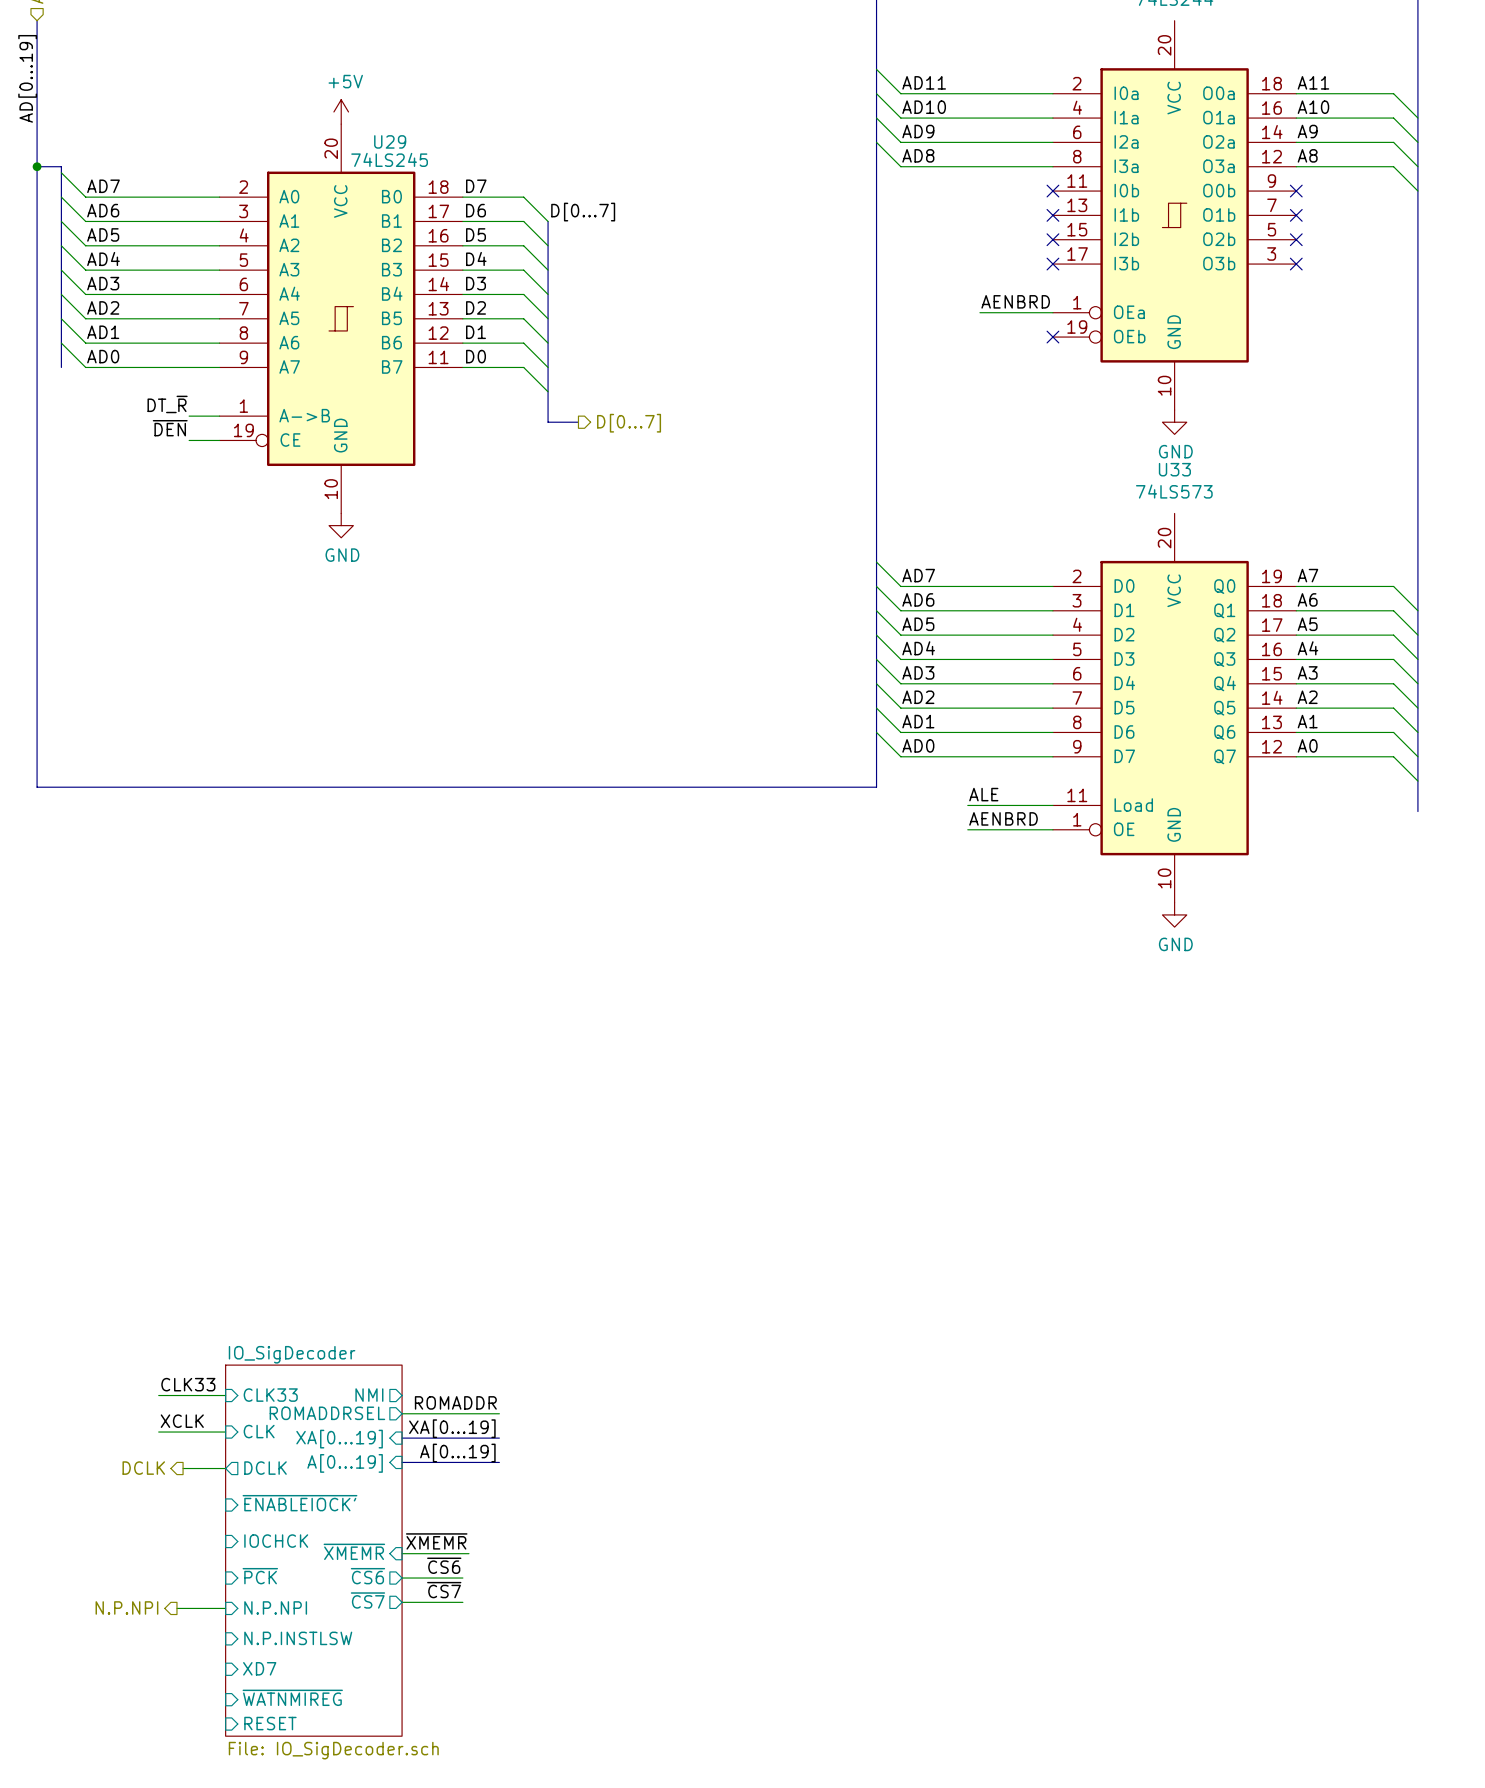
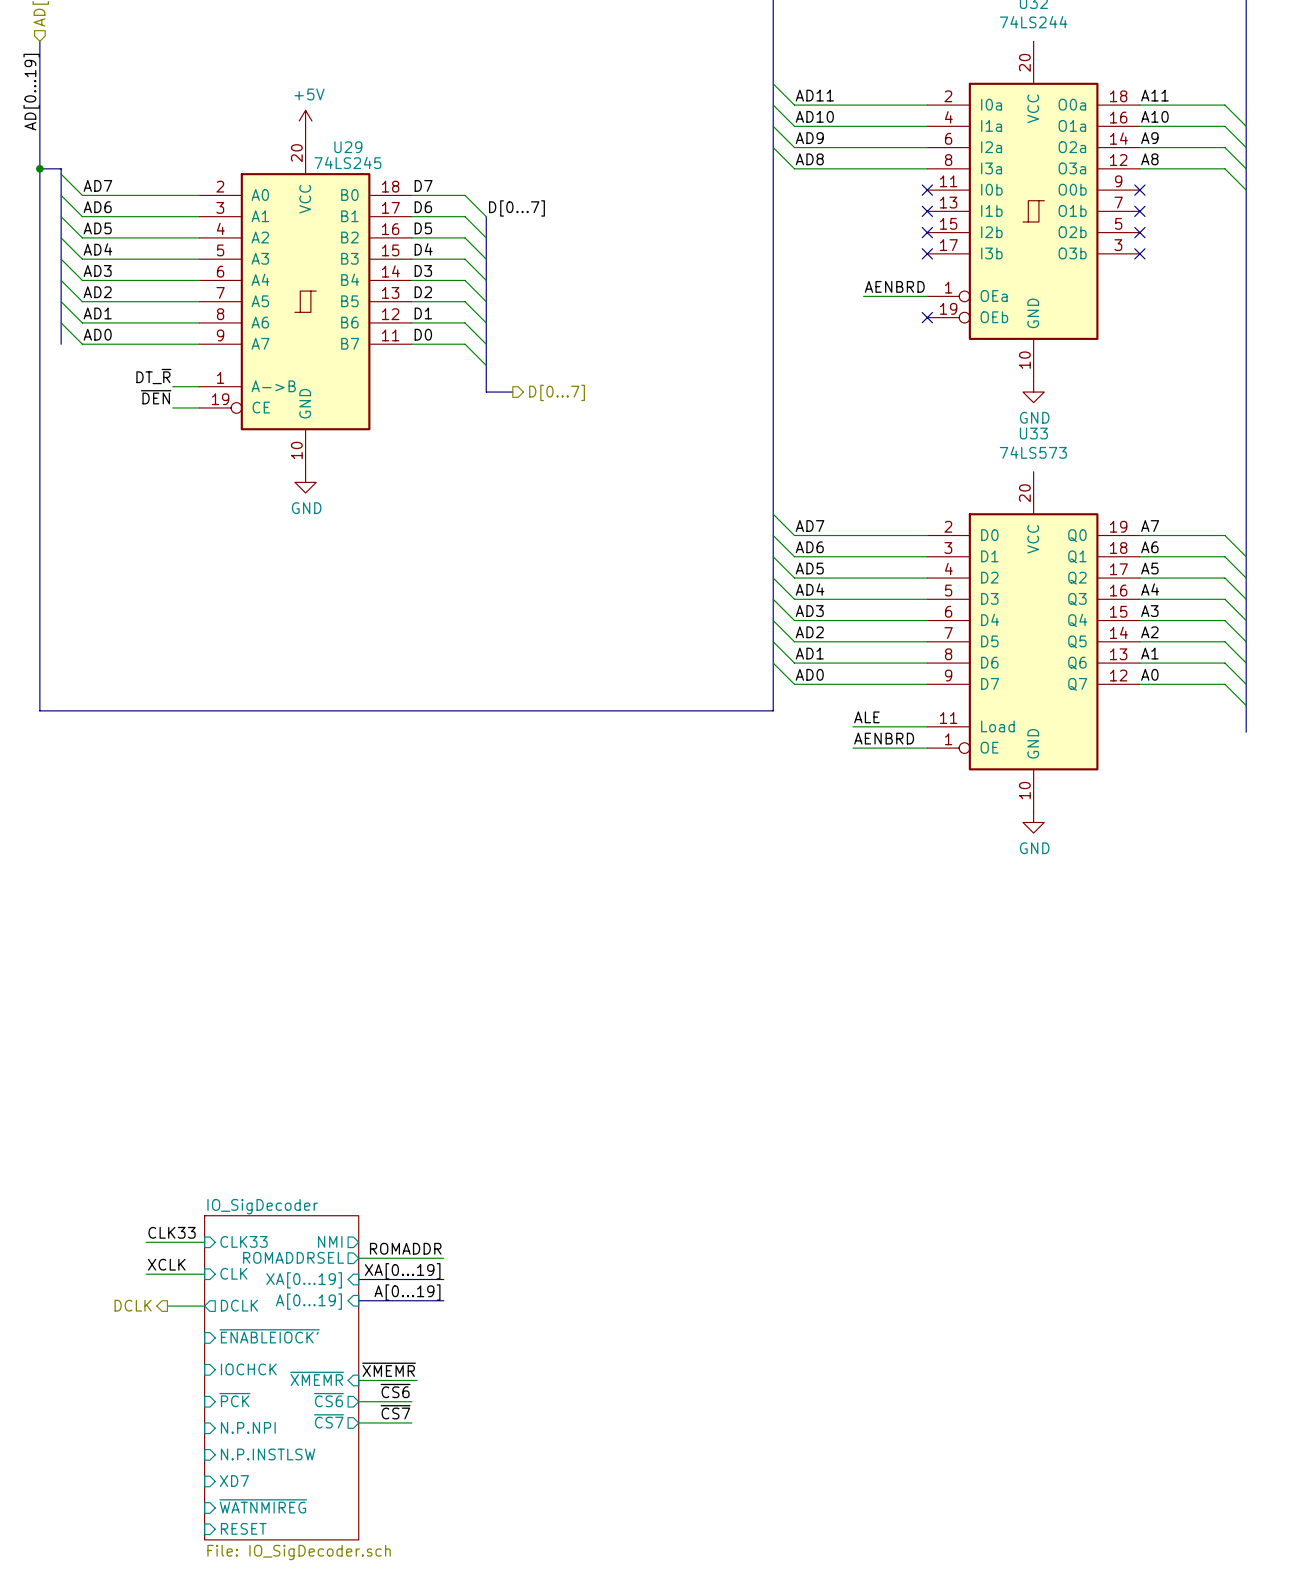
hierarchical label: N.P.NPI (126, 1607) -> none
wire: (176, 1608) (225, 1608) -> none

